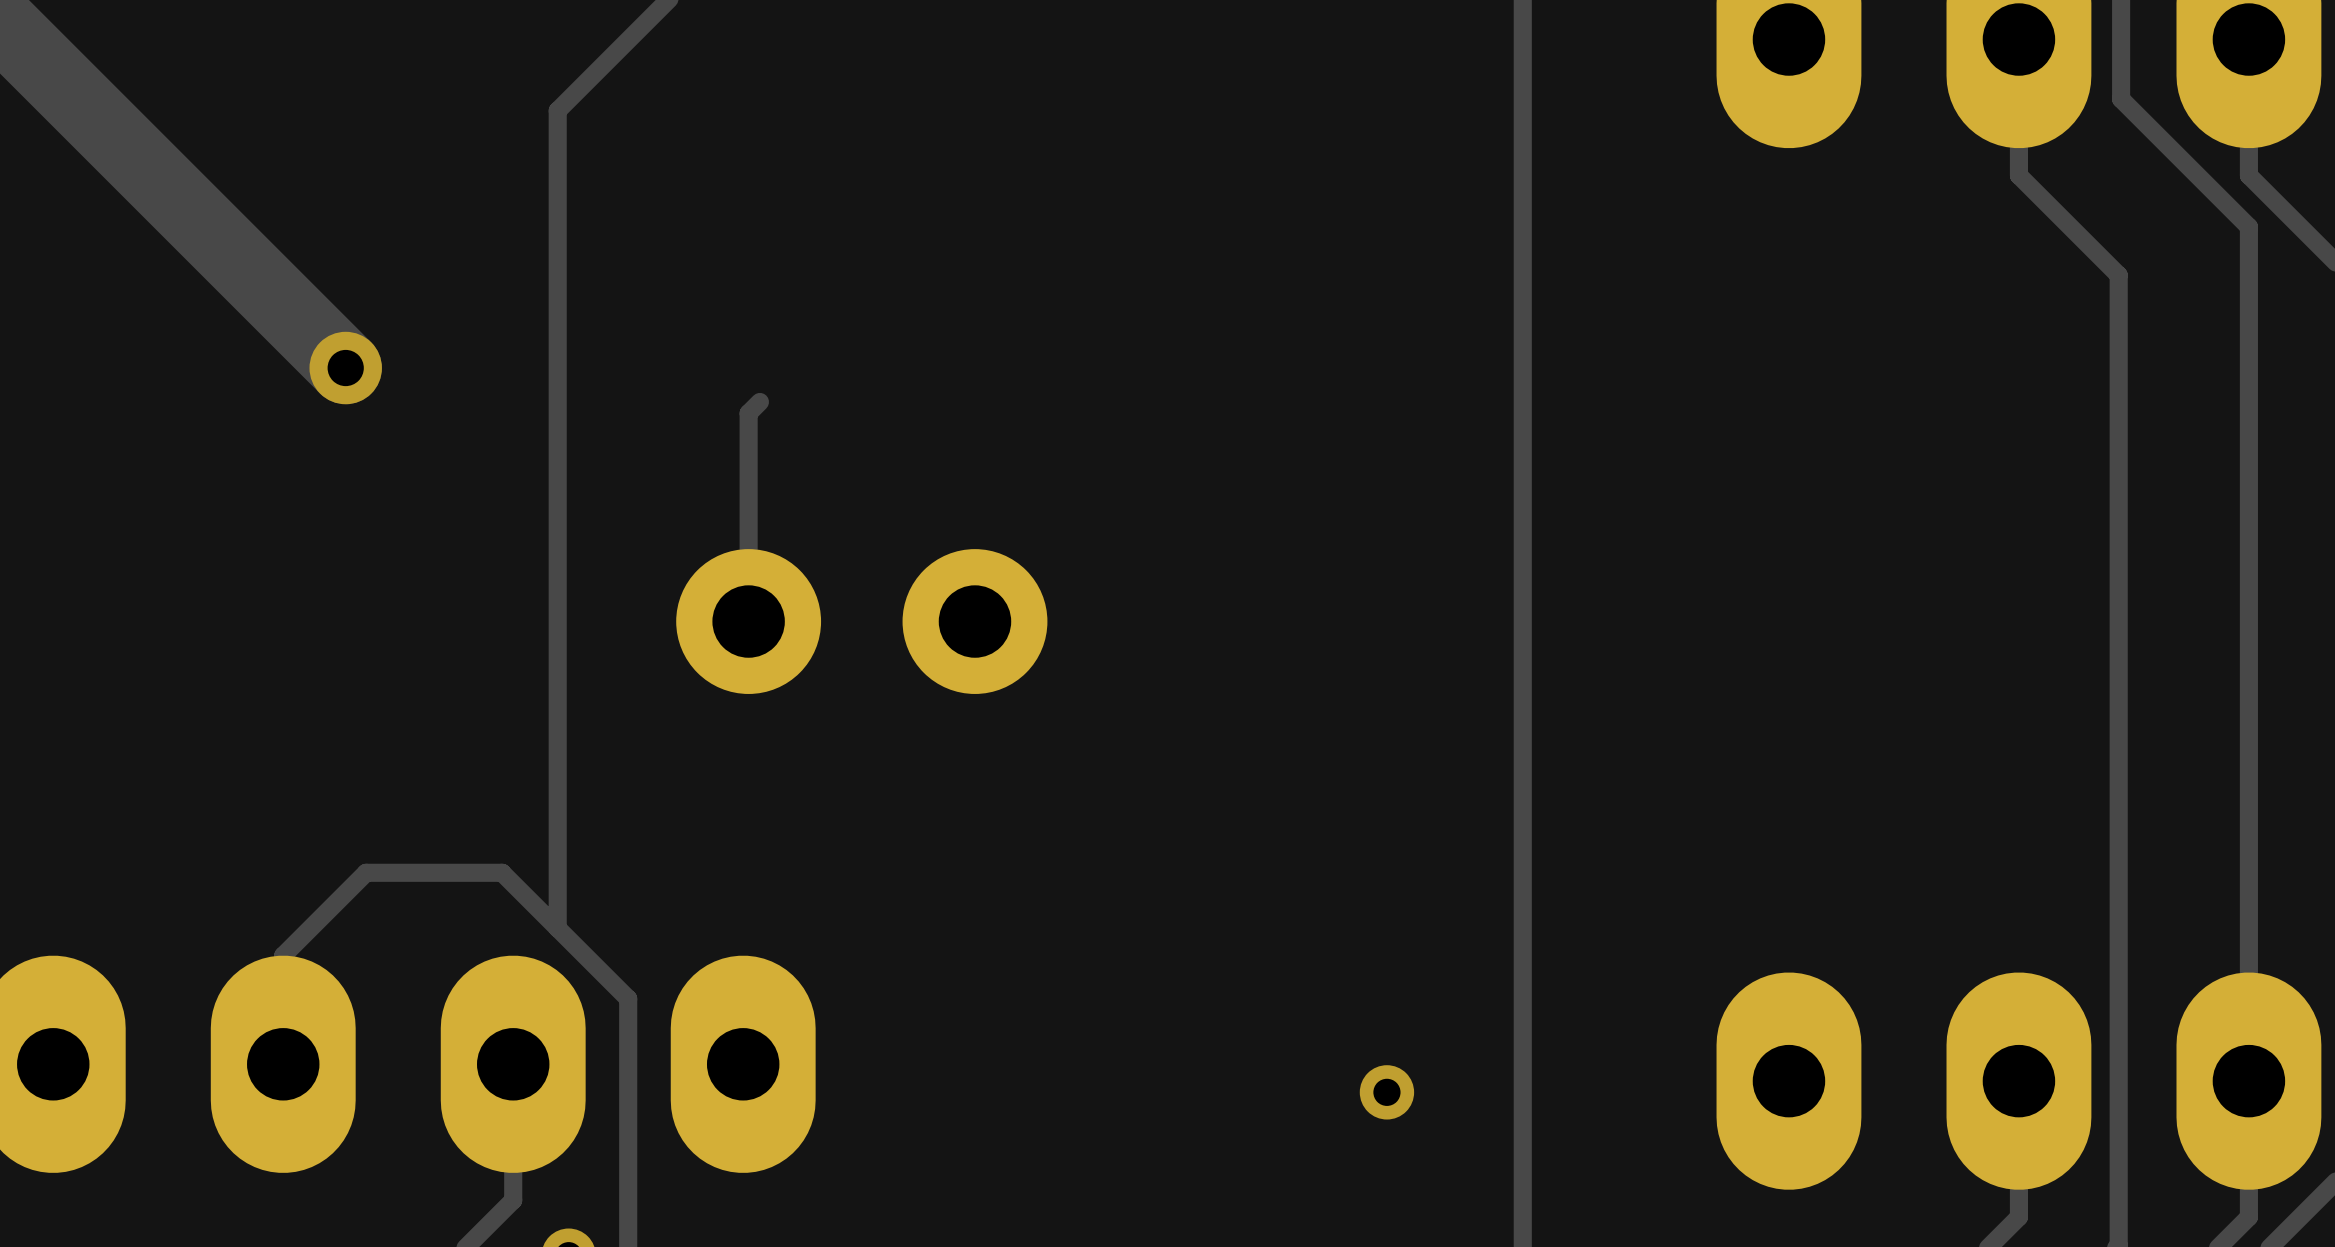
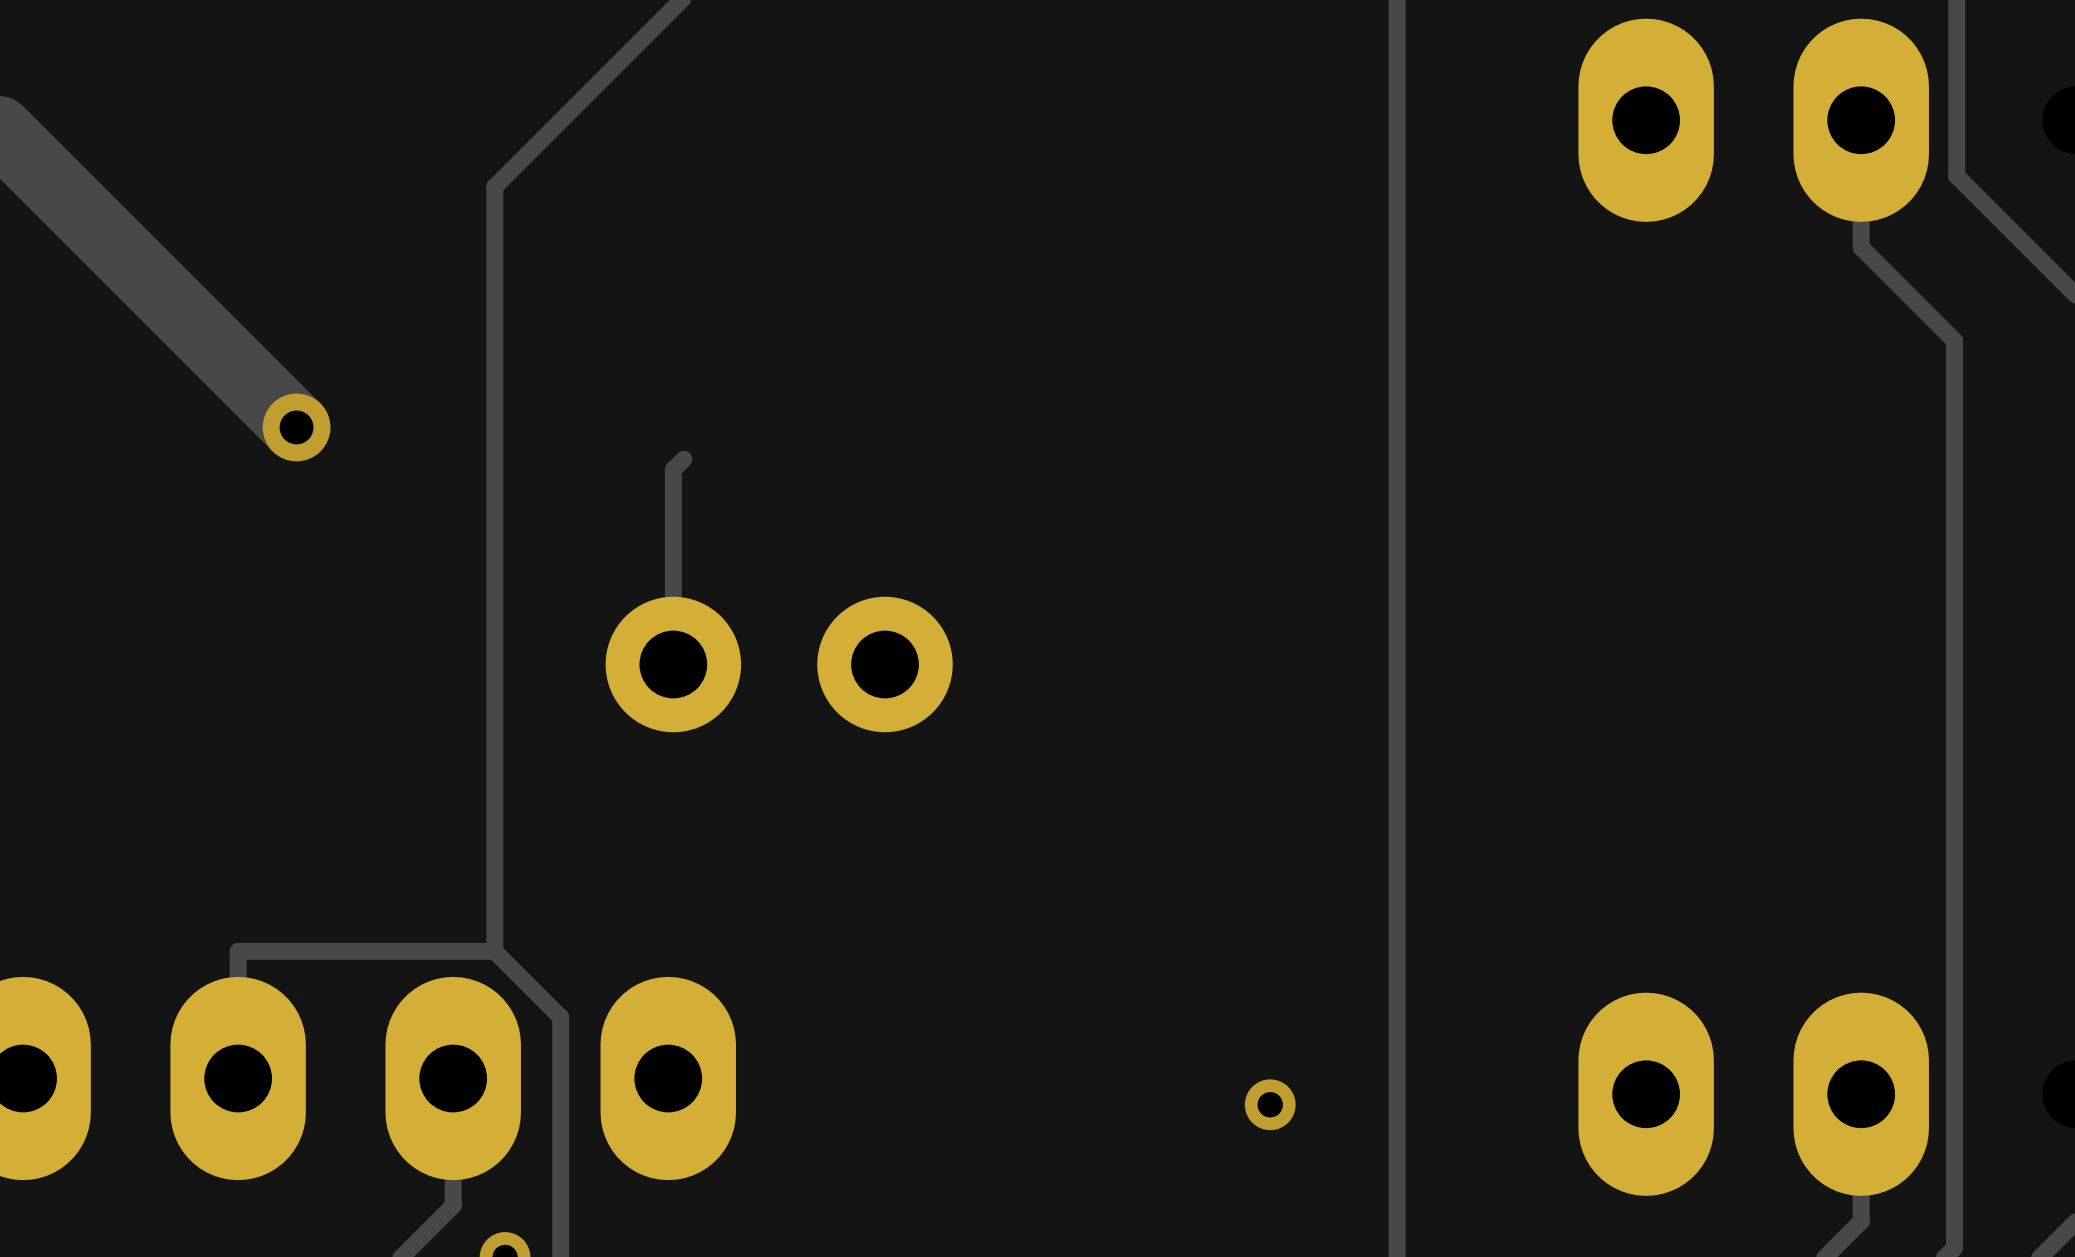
track: (557, 928) (502, 872) (366, 872) (283, 955) -> (494, 951) (238, 951) (238, 976)

